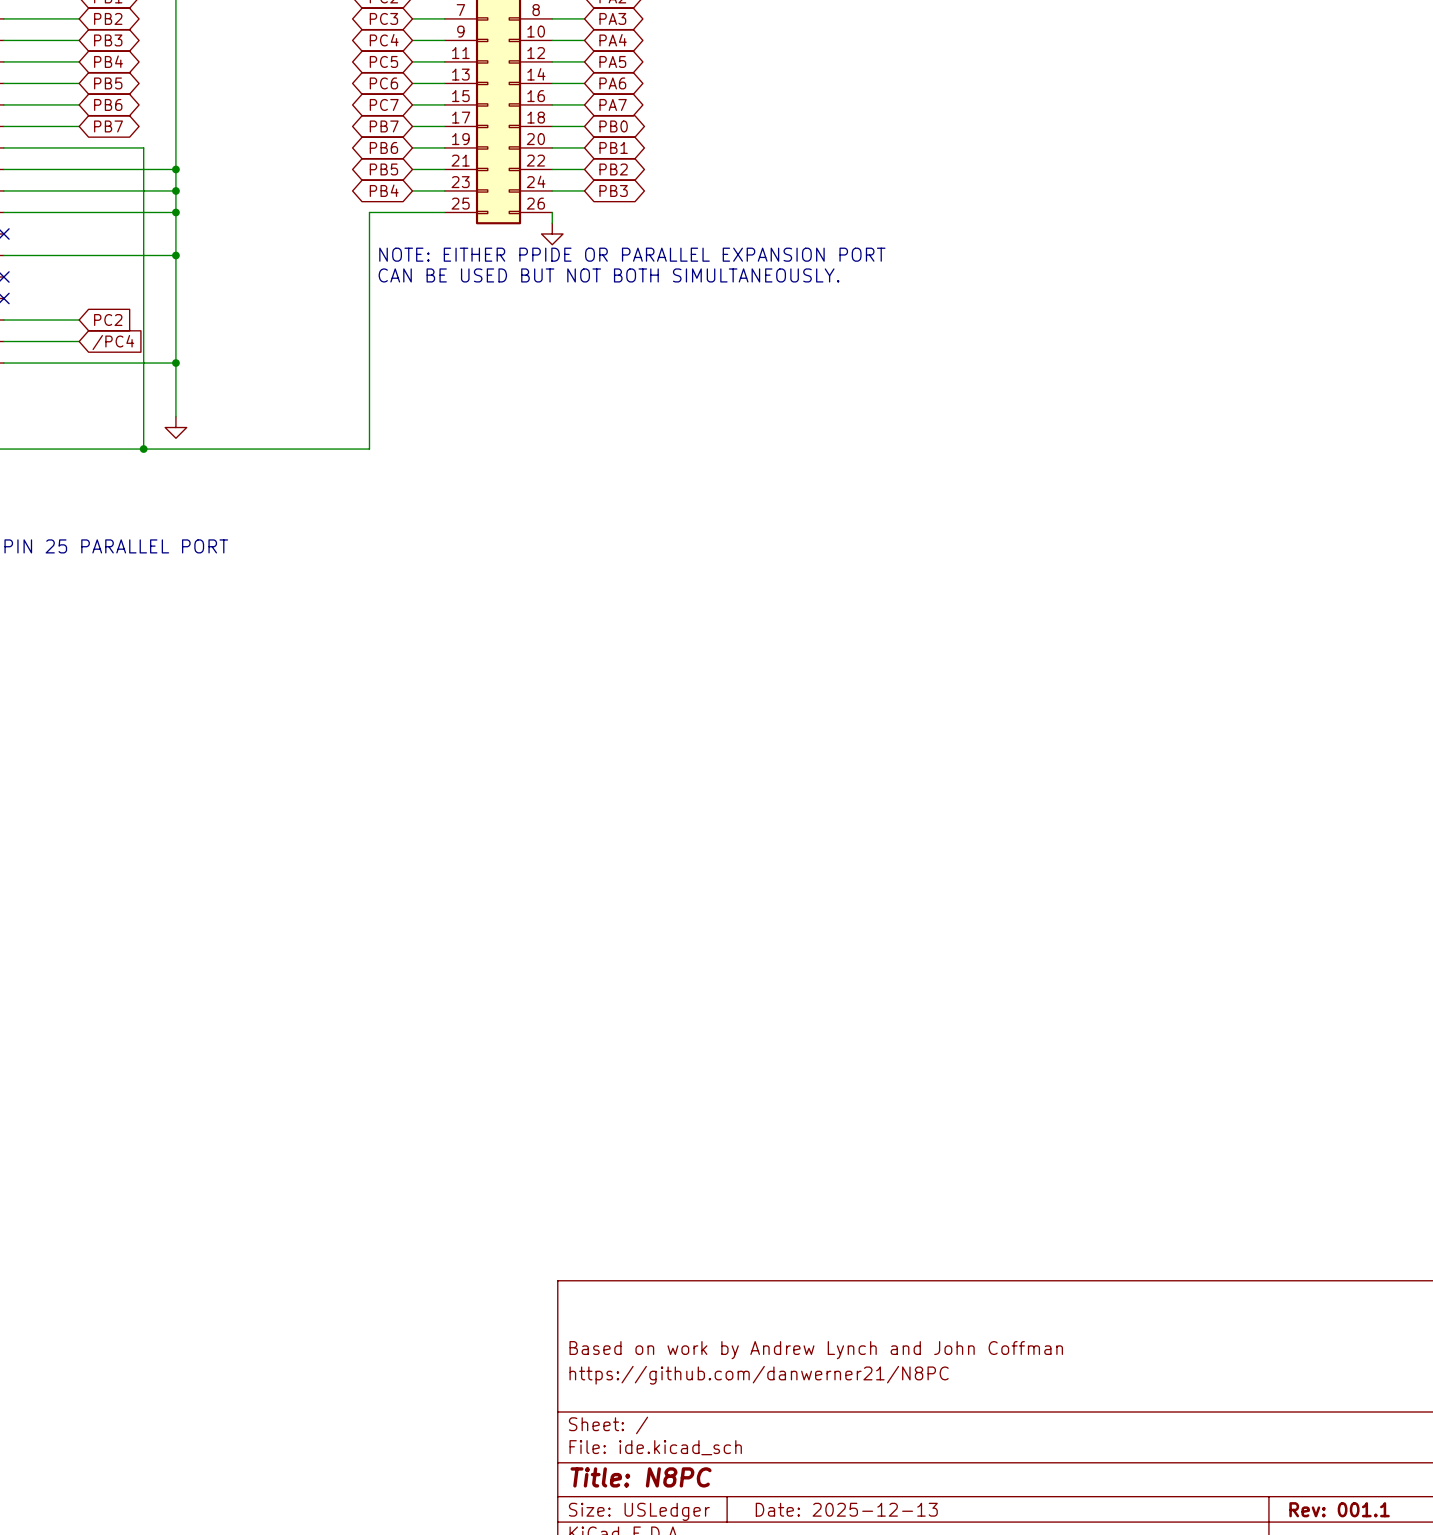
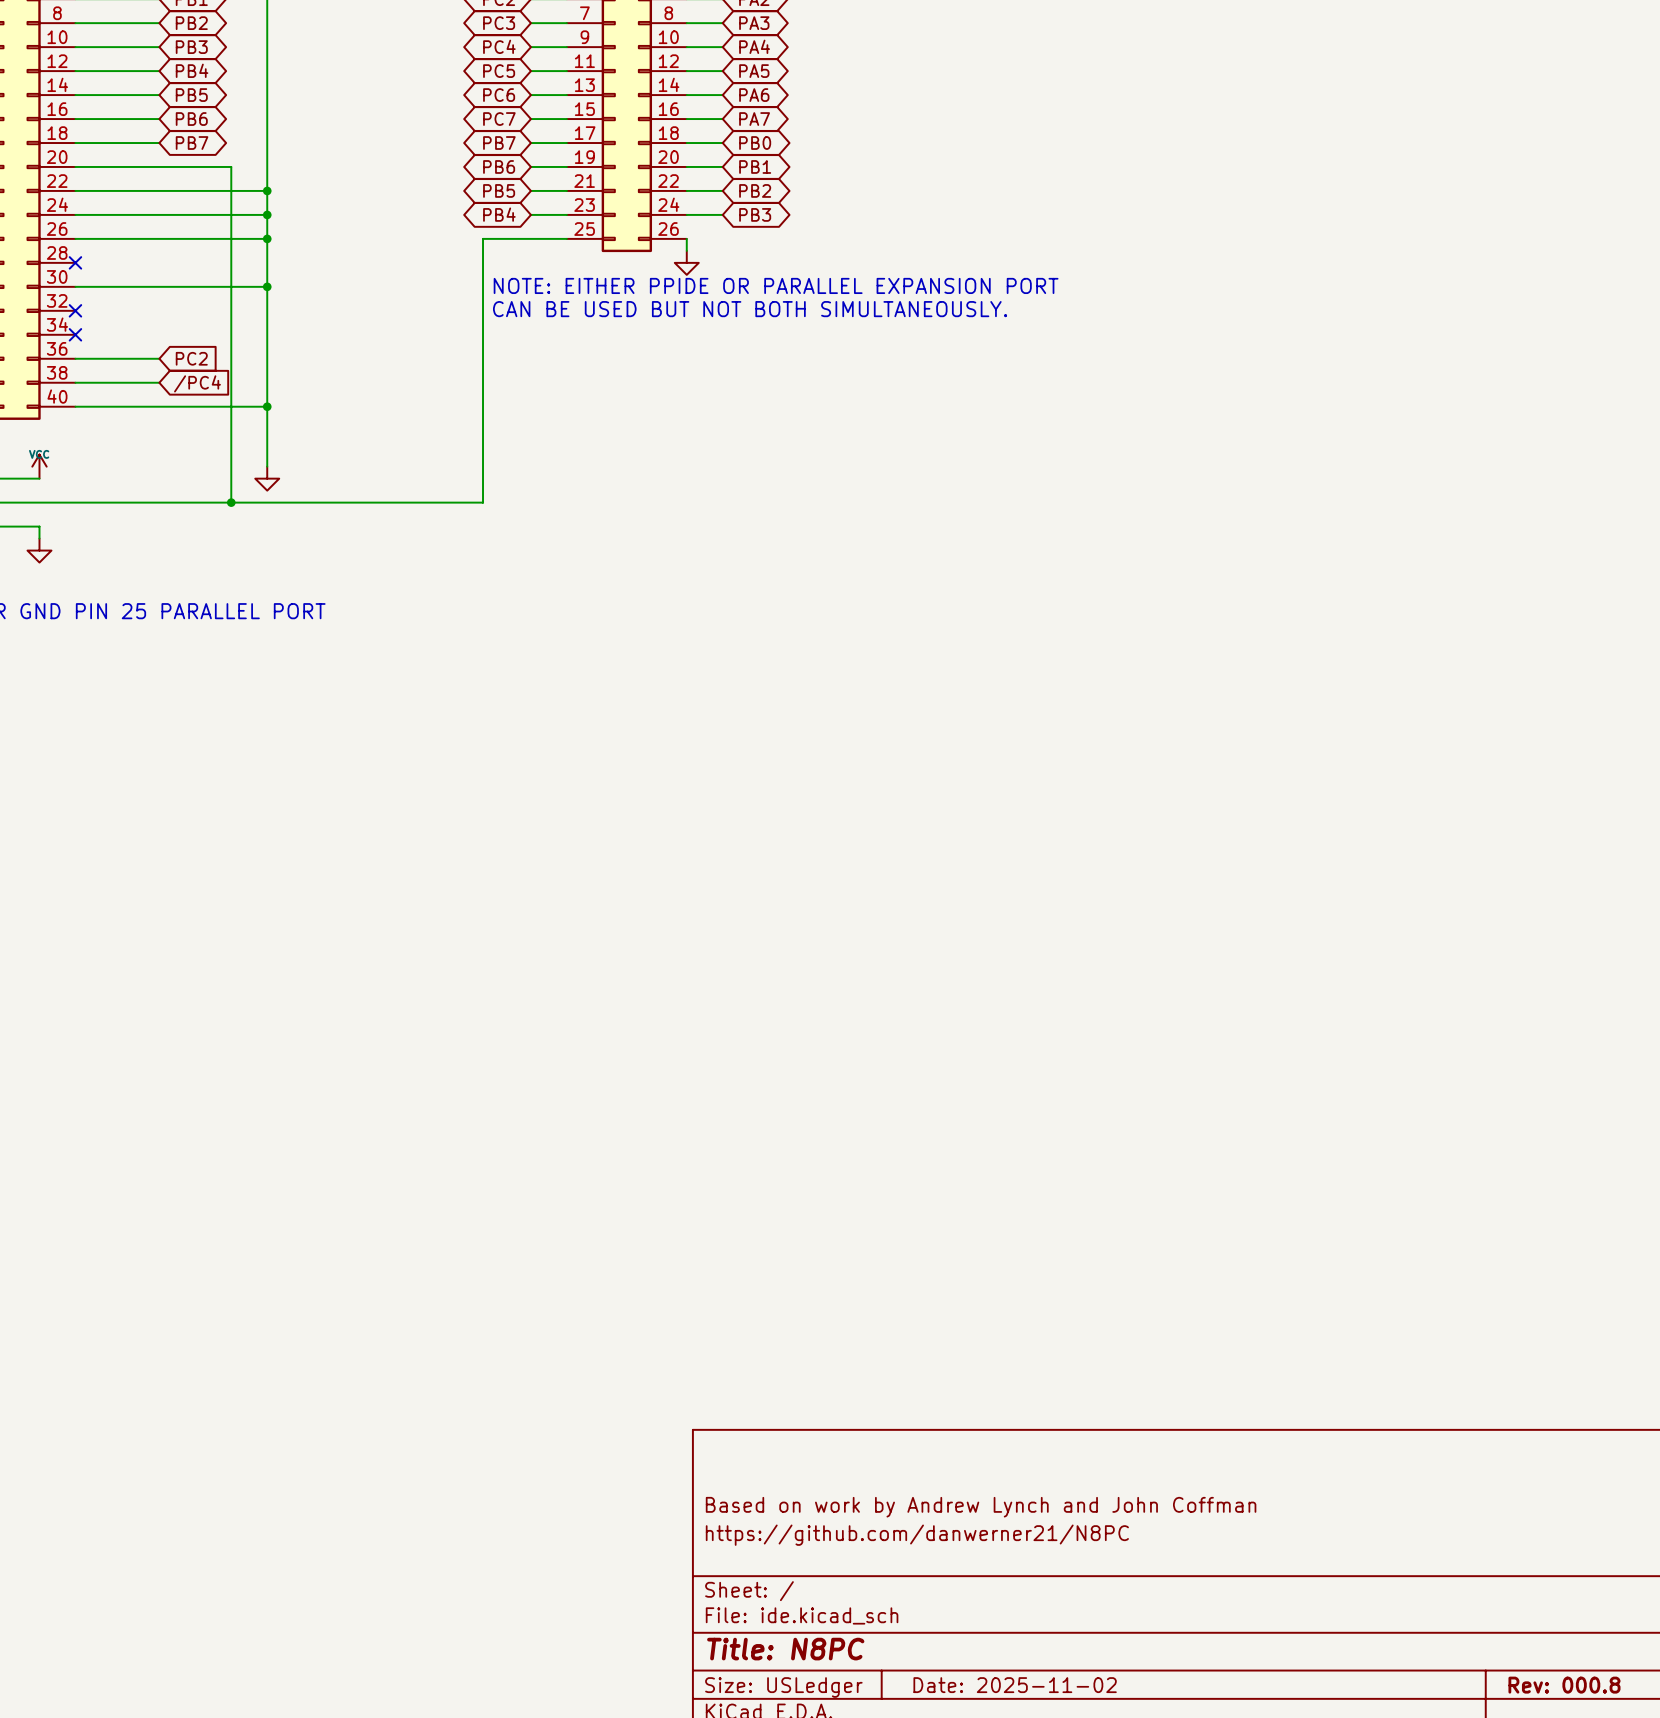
title block: Date: 2025-12-13 (846, 1509) -> Date: 2025-11-02 (1015, 1685)
title block: Rev: 001.1 (1339, 1509) -> Rev: 000.8 (1564, 1685)

